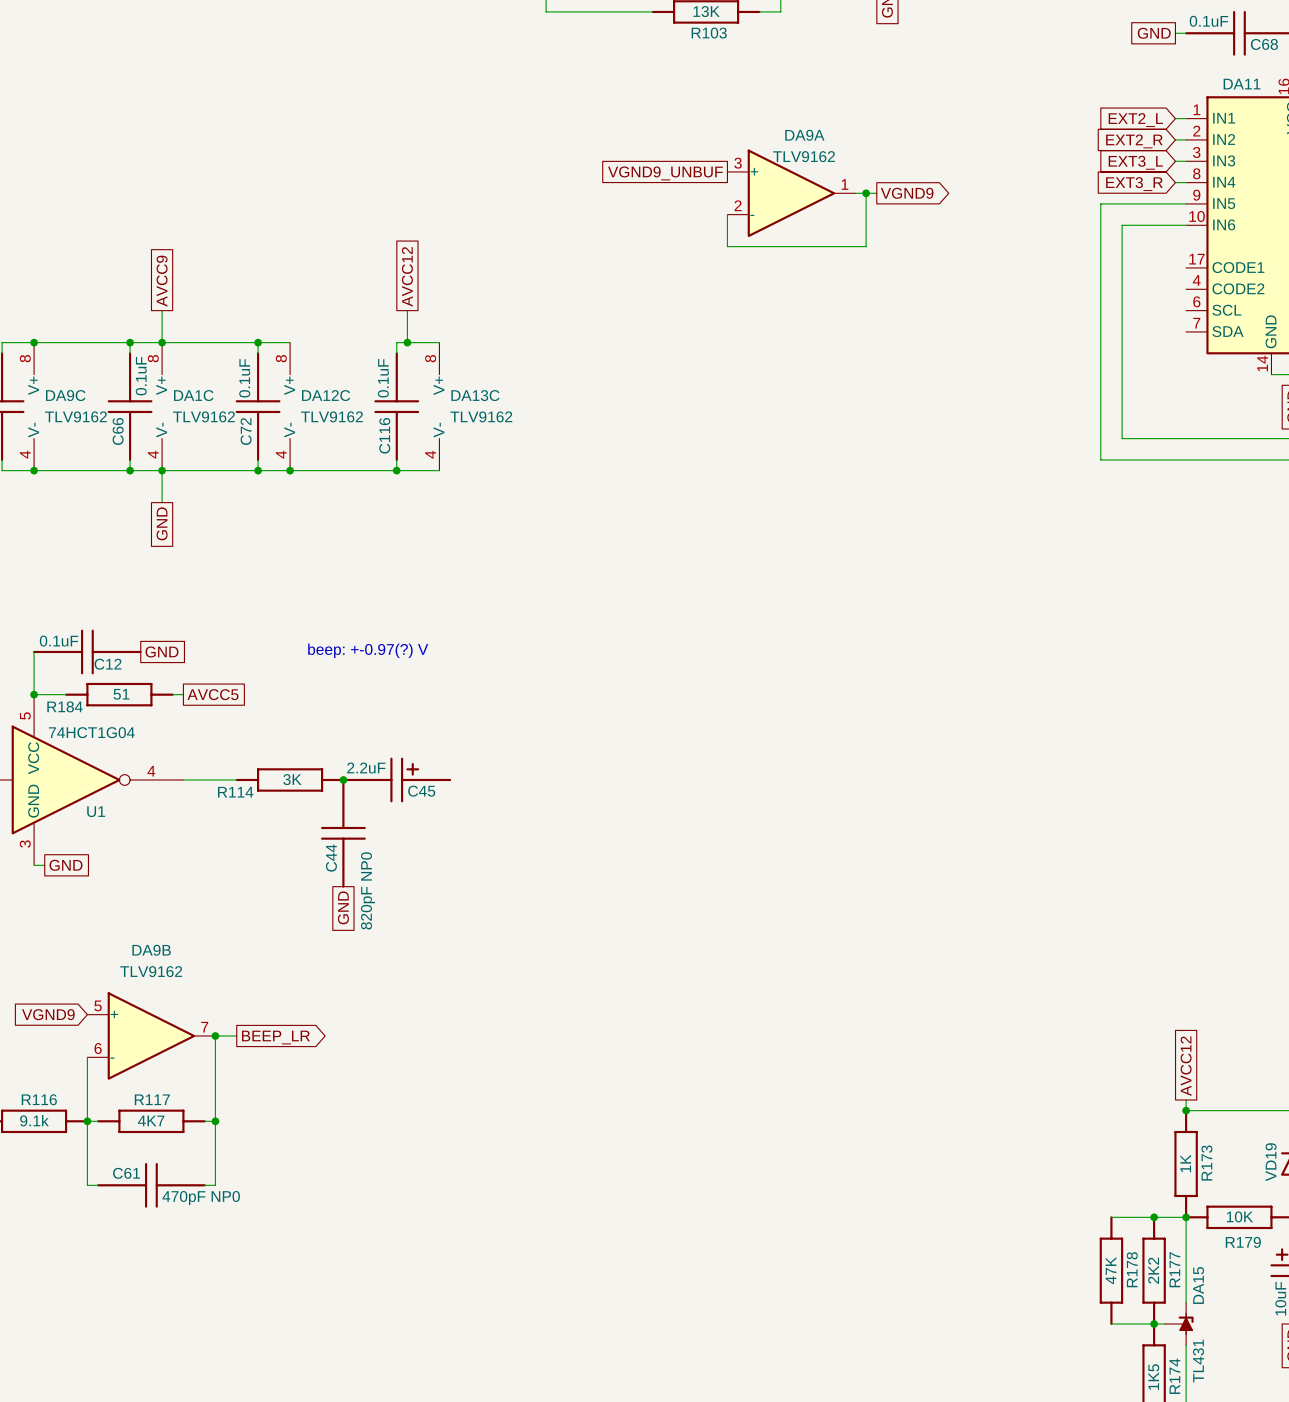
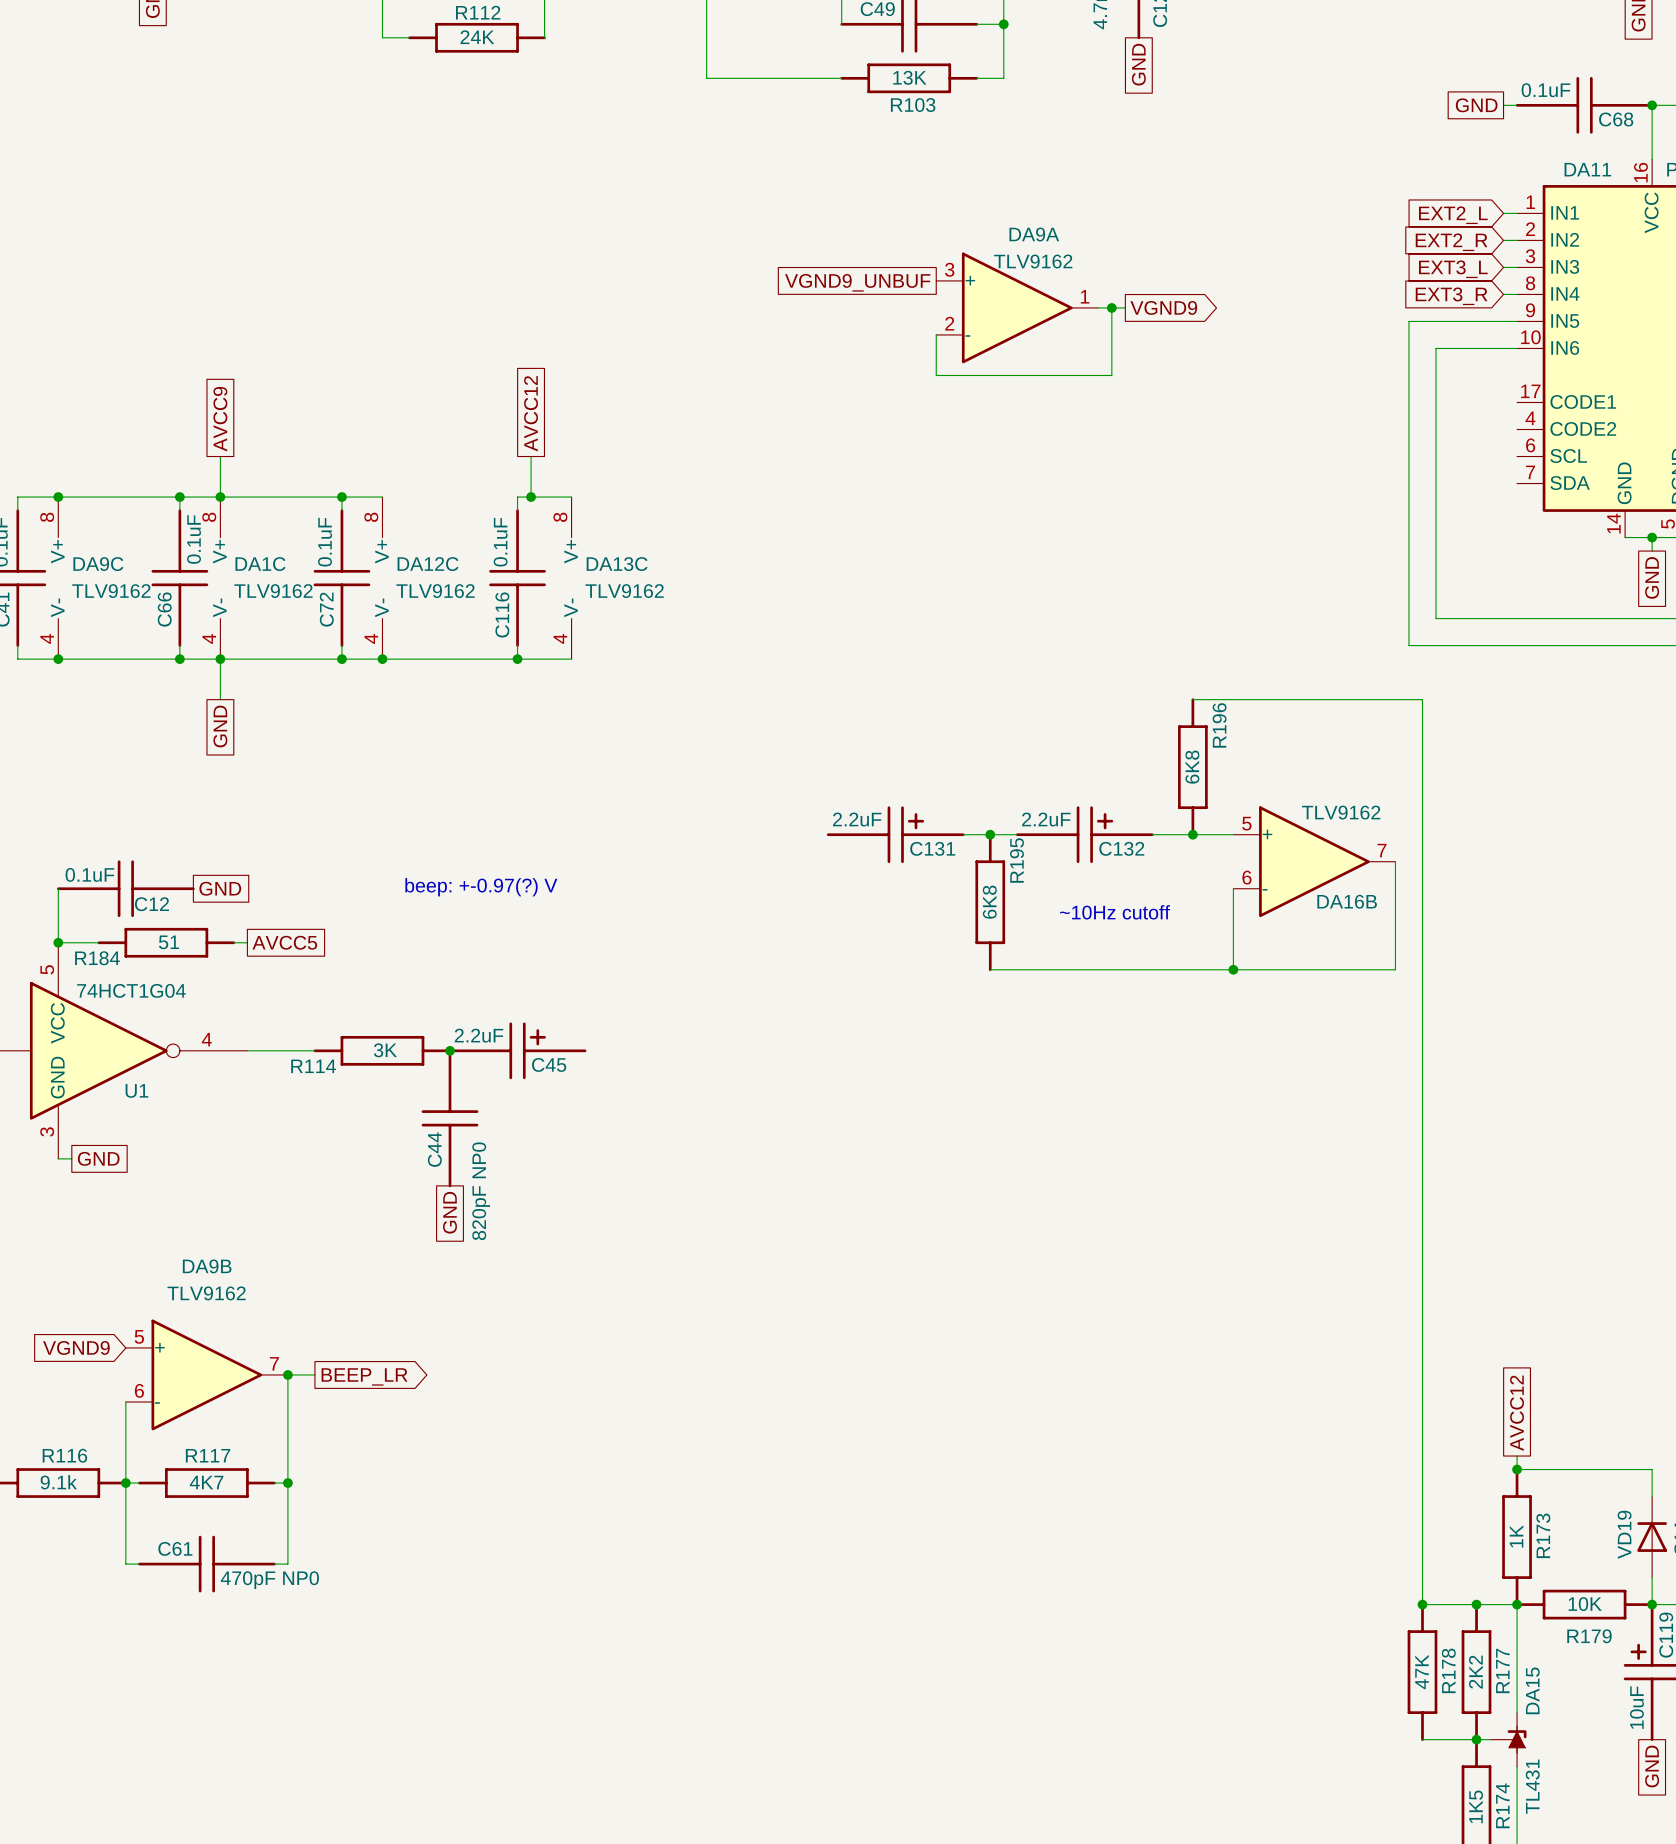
wire: none -> (1192, 699) (1422, 699) (1422, 1604)
R196: none -> 6K8 (1192, 767)
C131: none -> 2.2uF (895, 834)
wire: none -> (963, 834) (1017, 834)
junction: none -> (990, 834)
C132: none -> 2.2uF (1084, 834)
wire: none -> (1152, 834) (1233, 834)
junction: none -> (1192, 834)
DA16B: none -> TLV9162 (1314, 861)
wire: none -> (1395, 861) (1395, 969) (990, 969)
wire: none -> (1233, 888) (1233, 969)
R195: none -> 6K8 (990, 902)
text: none -> ~10Hz cutoff (1114, 912)
junction: none -> (1233, 969)
junction: none -> (1422, 1604)

